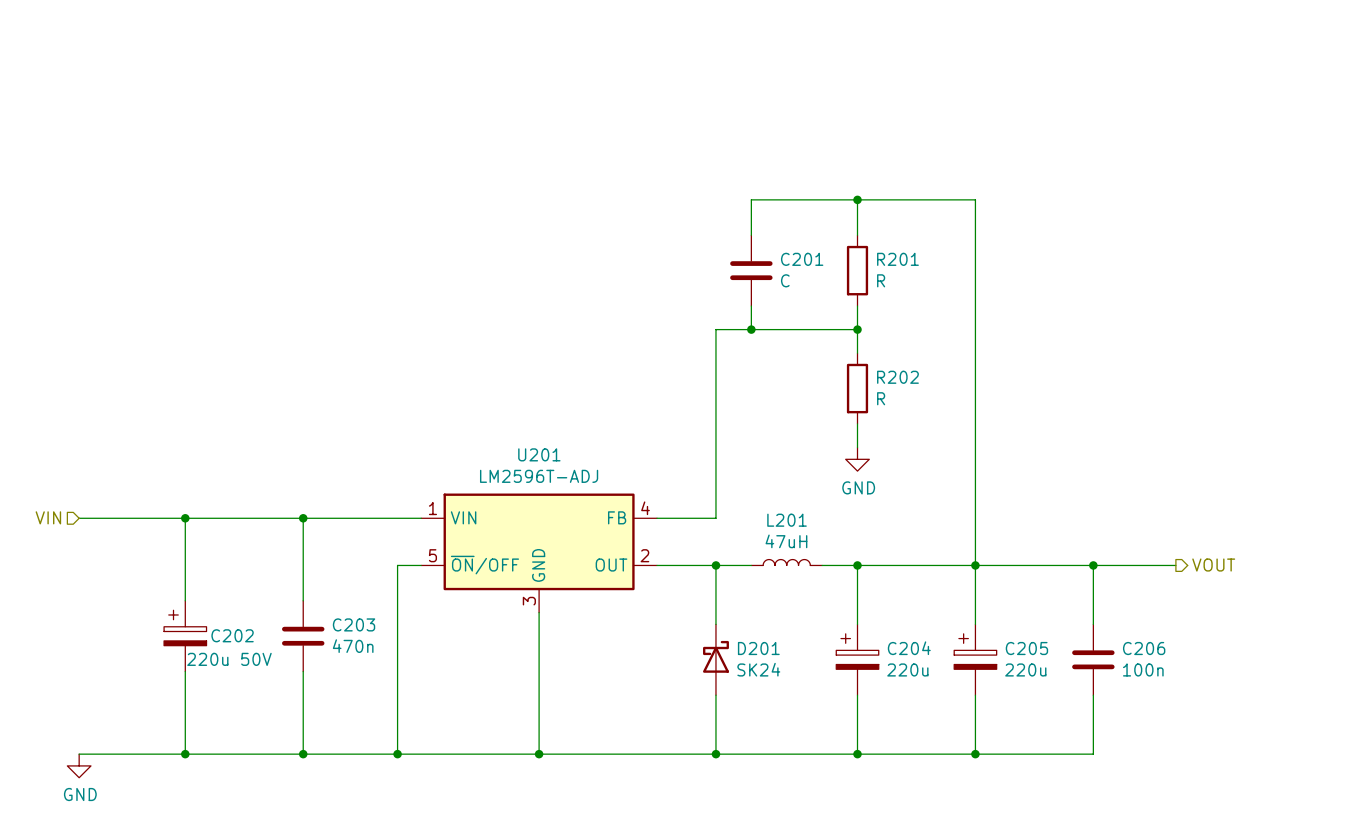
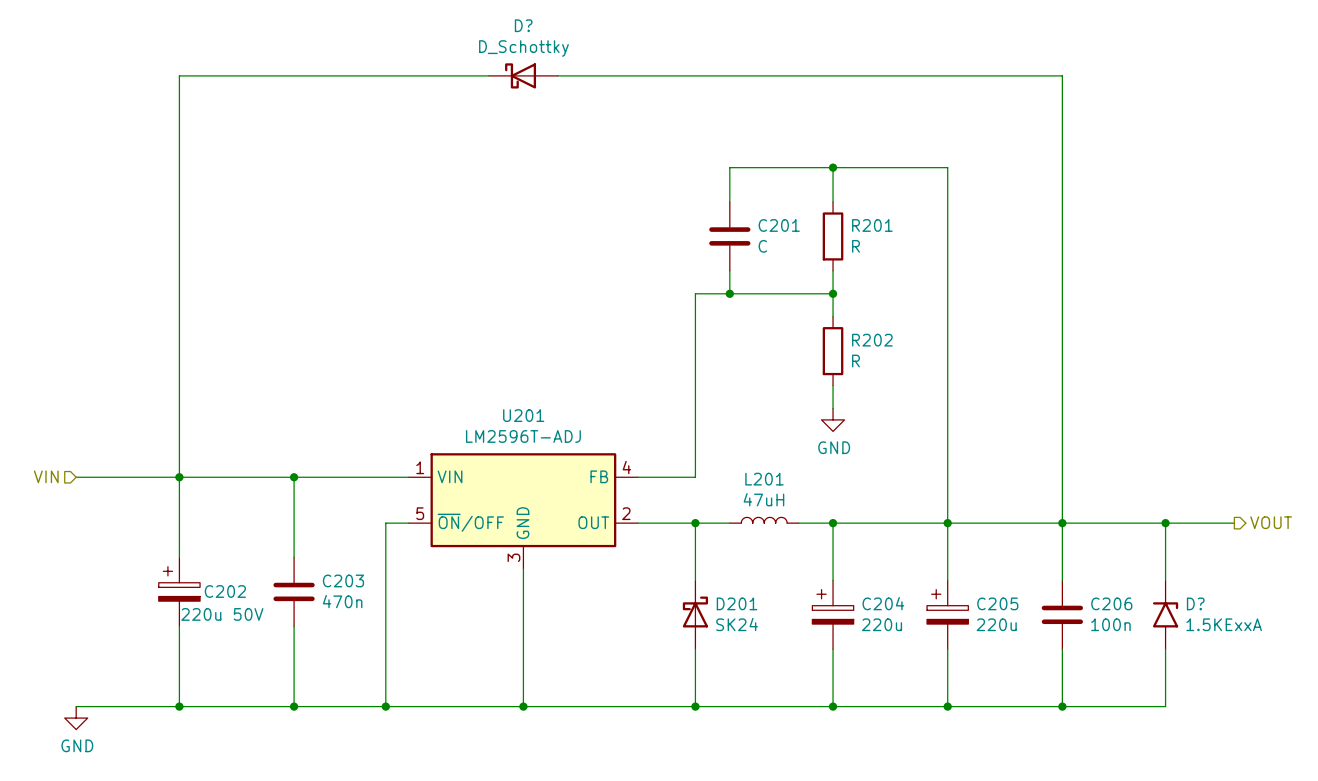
wire: none -> (489, 75) (179, 75) (179, 477)
D?: none -> D_Schottky (523, 75)
wire: none -> (557, 75) (1062, 75) (1062, 523)
wire: none -> (1142, 523) (1234, 523)
wire: none -> (1165, 523) (1165, 580)
junction: none -> (1165, 523)
hierarchical label position: VOUT (1213, 565) -> VOUT (1271, 522)
D?: none -> 1.5KExxA (1165, 614)
wire: none -> (1165, 649) (1165, 706) (1062, 706)
junction: none -> (1062, 706)

